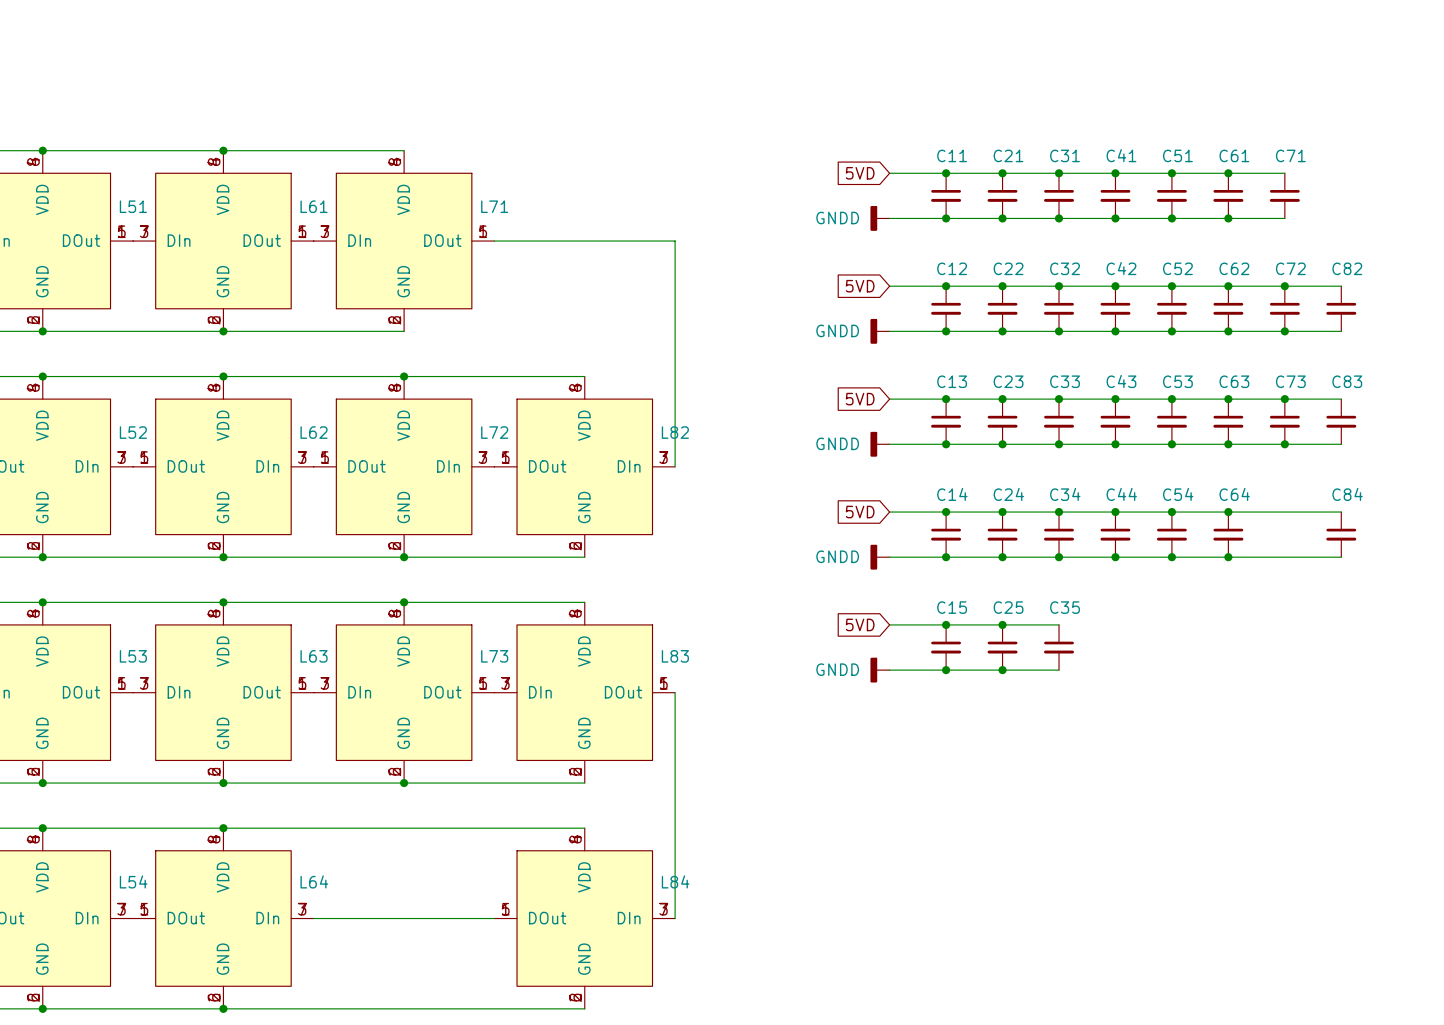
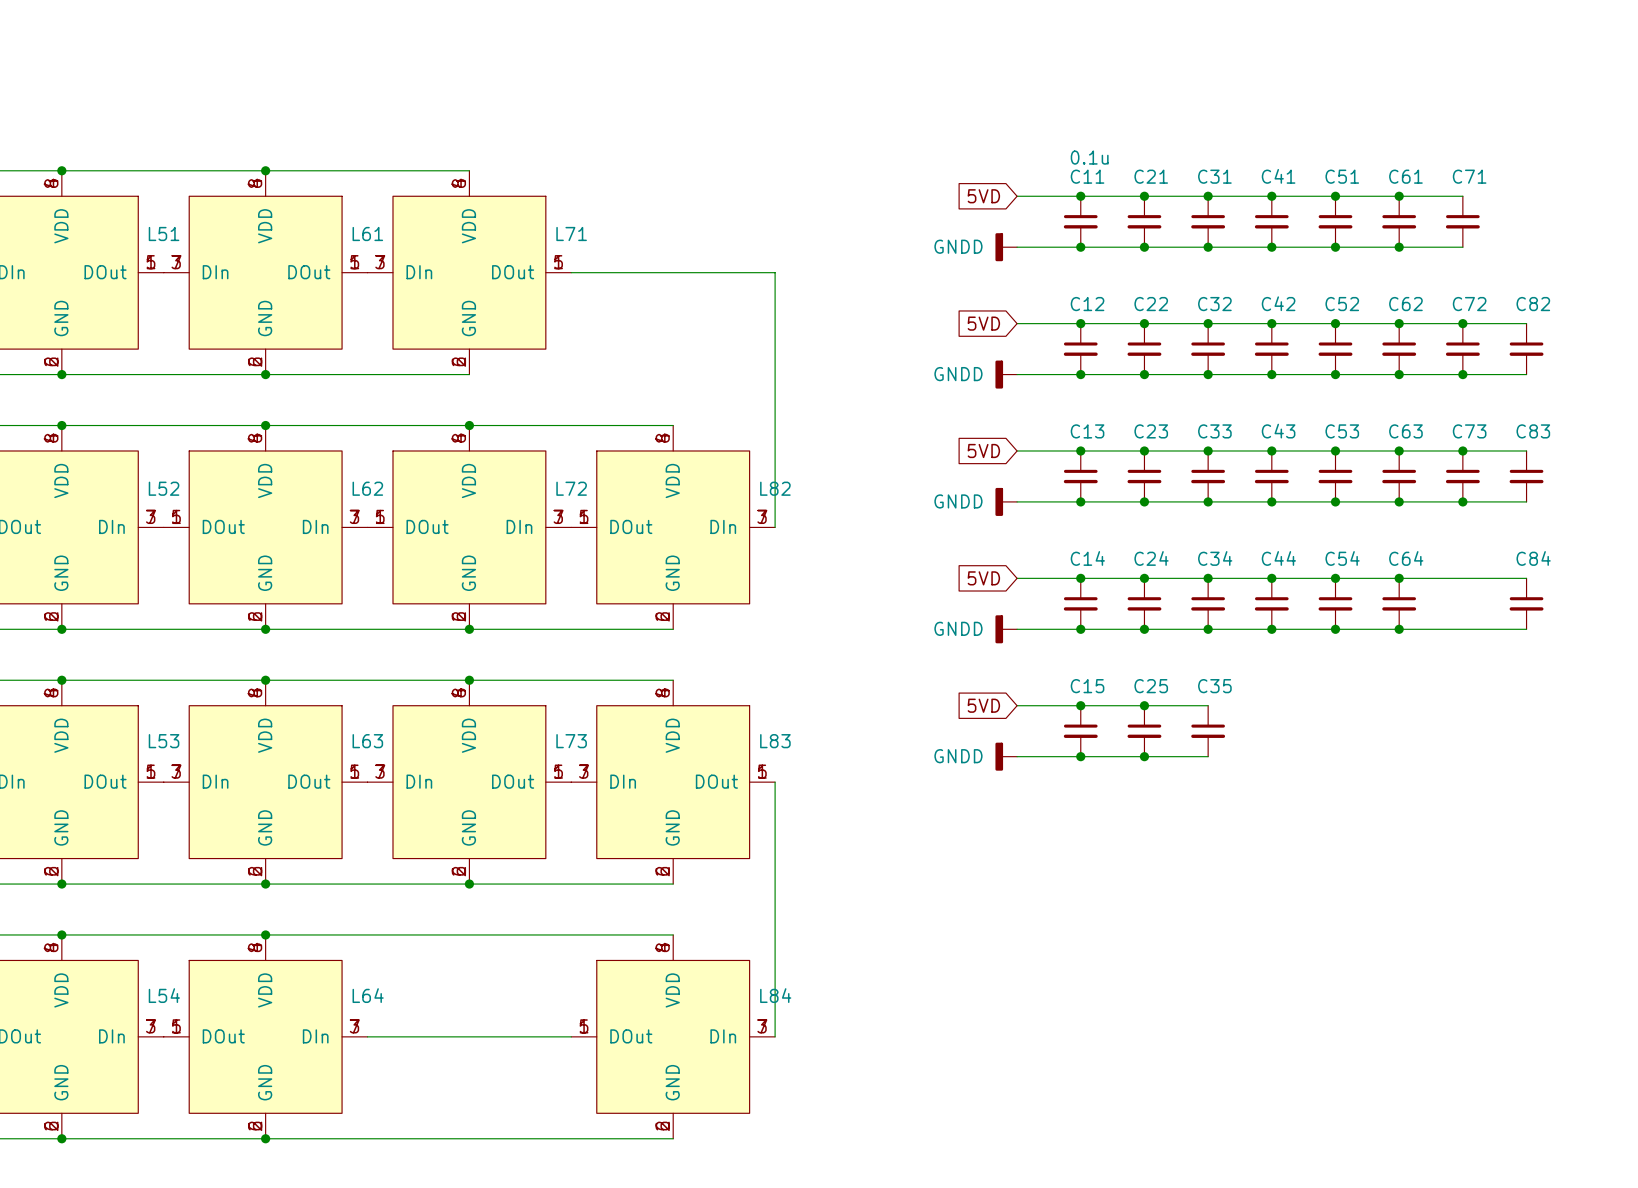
C11 value: none -> 0.1u (1089, 157)

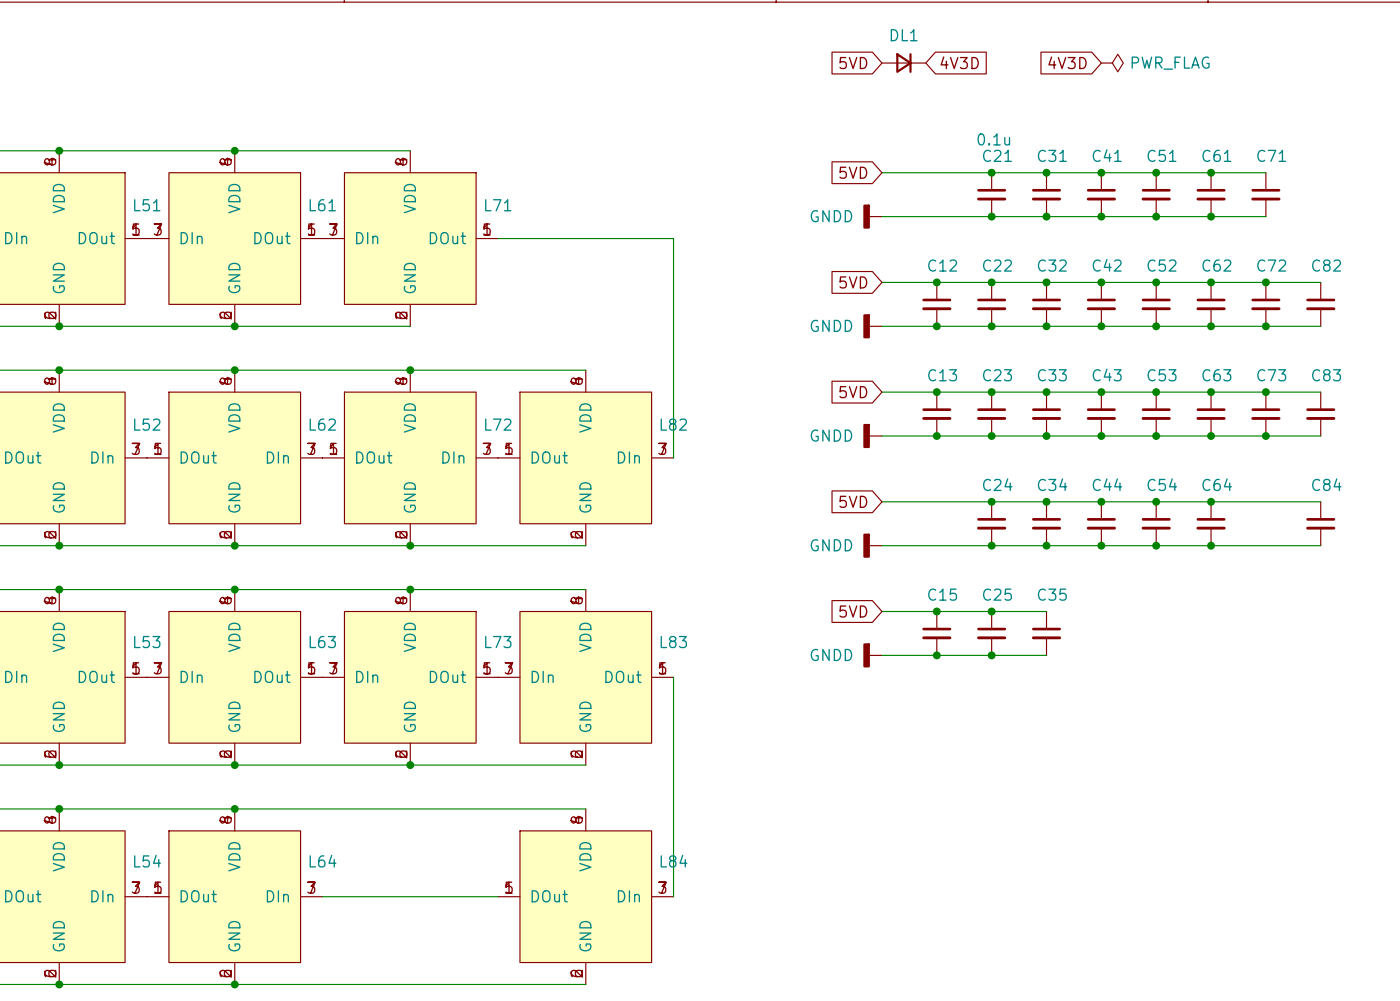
global label: none -> 5VD (853, 63)
DL1: none -> (903, 63)
global label: none -> 4V3D (959, 62)
global label: none -> 4V3D (1067, 62)
power symbol: none -> PWR_FLAG (1112, 63)
C21 value: none -> 0.1u (993, 139)
junction: (1080, 196) -> none
C11: 0.1u (1080, 221) -> none
junction: (1080, 247) -> none
junction: (1080, 578) -> none
C14: (1080, 603) -> none
junction: (1080, 629) -> none

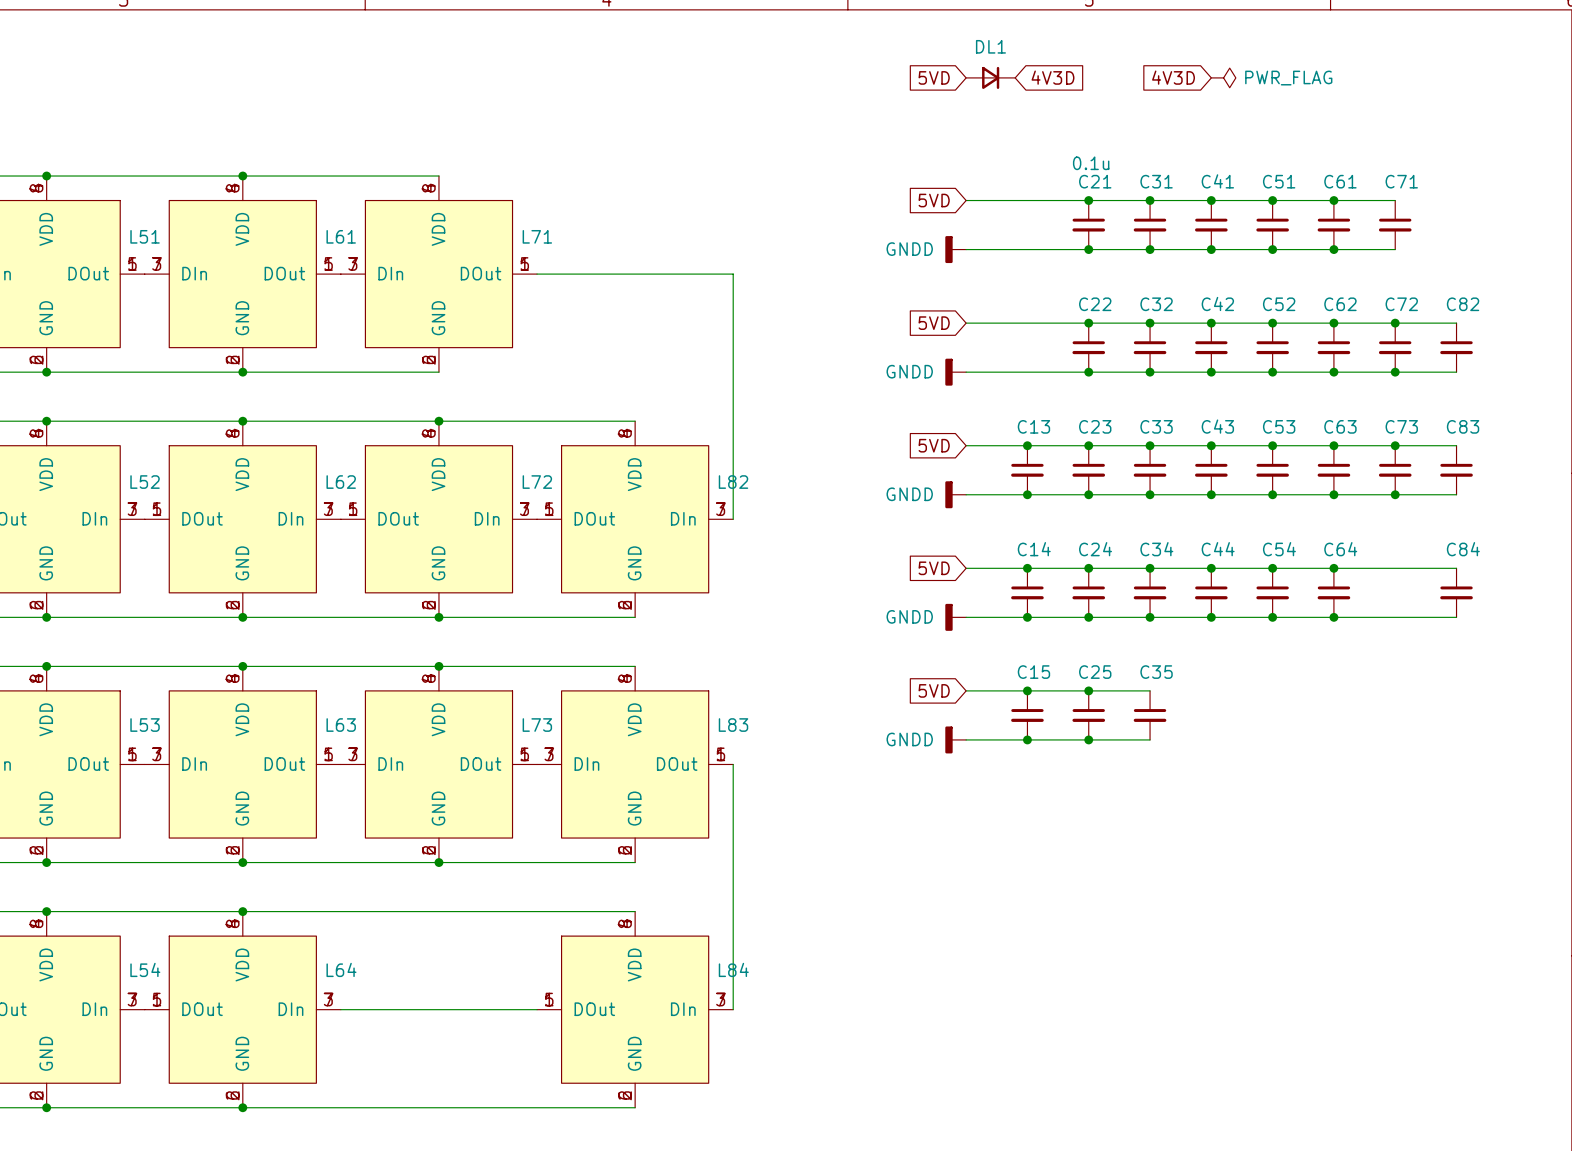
junction: (936, 282) -> none
C12: (936, 304) -> none
junction: (936, 326) -> none
junction: none -> (1027, 568)
C14: none -> (1027, 592)
junction: none -> (1027, 617)

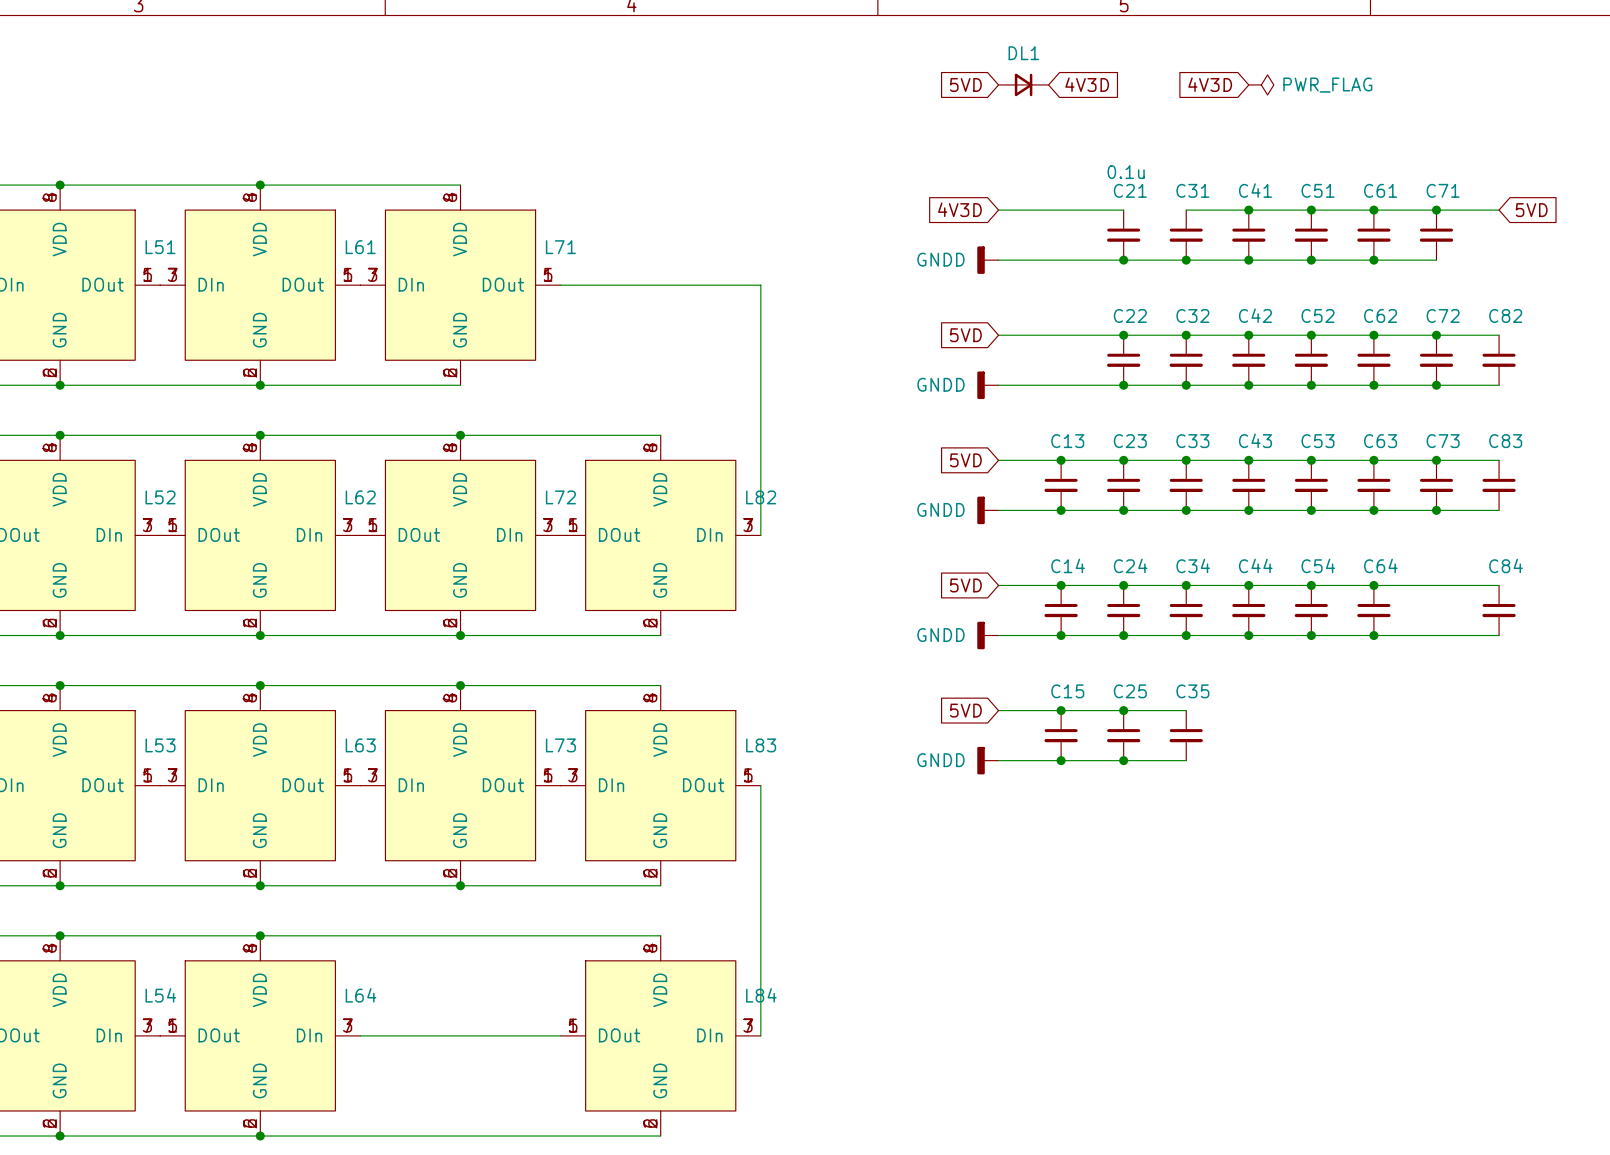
global label: 5VD (934, 200) -> 4V3D (959, 209)
wire: (1088, 200) (1150, 200) -> none
junction: (1088, 200) -> none
junction: (1150, 200) -> none
wire: none -> (1436, 210) (1499, 210)
junction: none -> (1436, 210)
global label: none -> 5VD (1531, 210)

